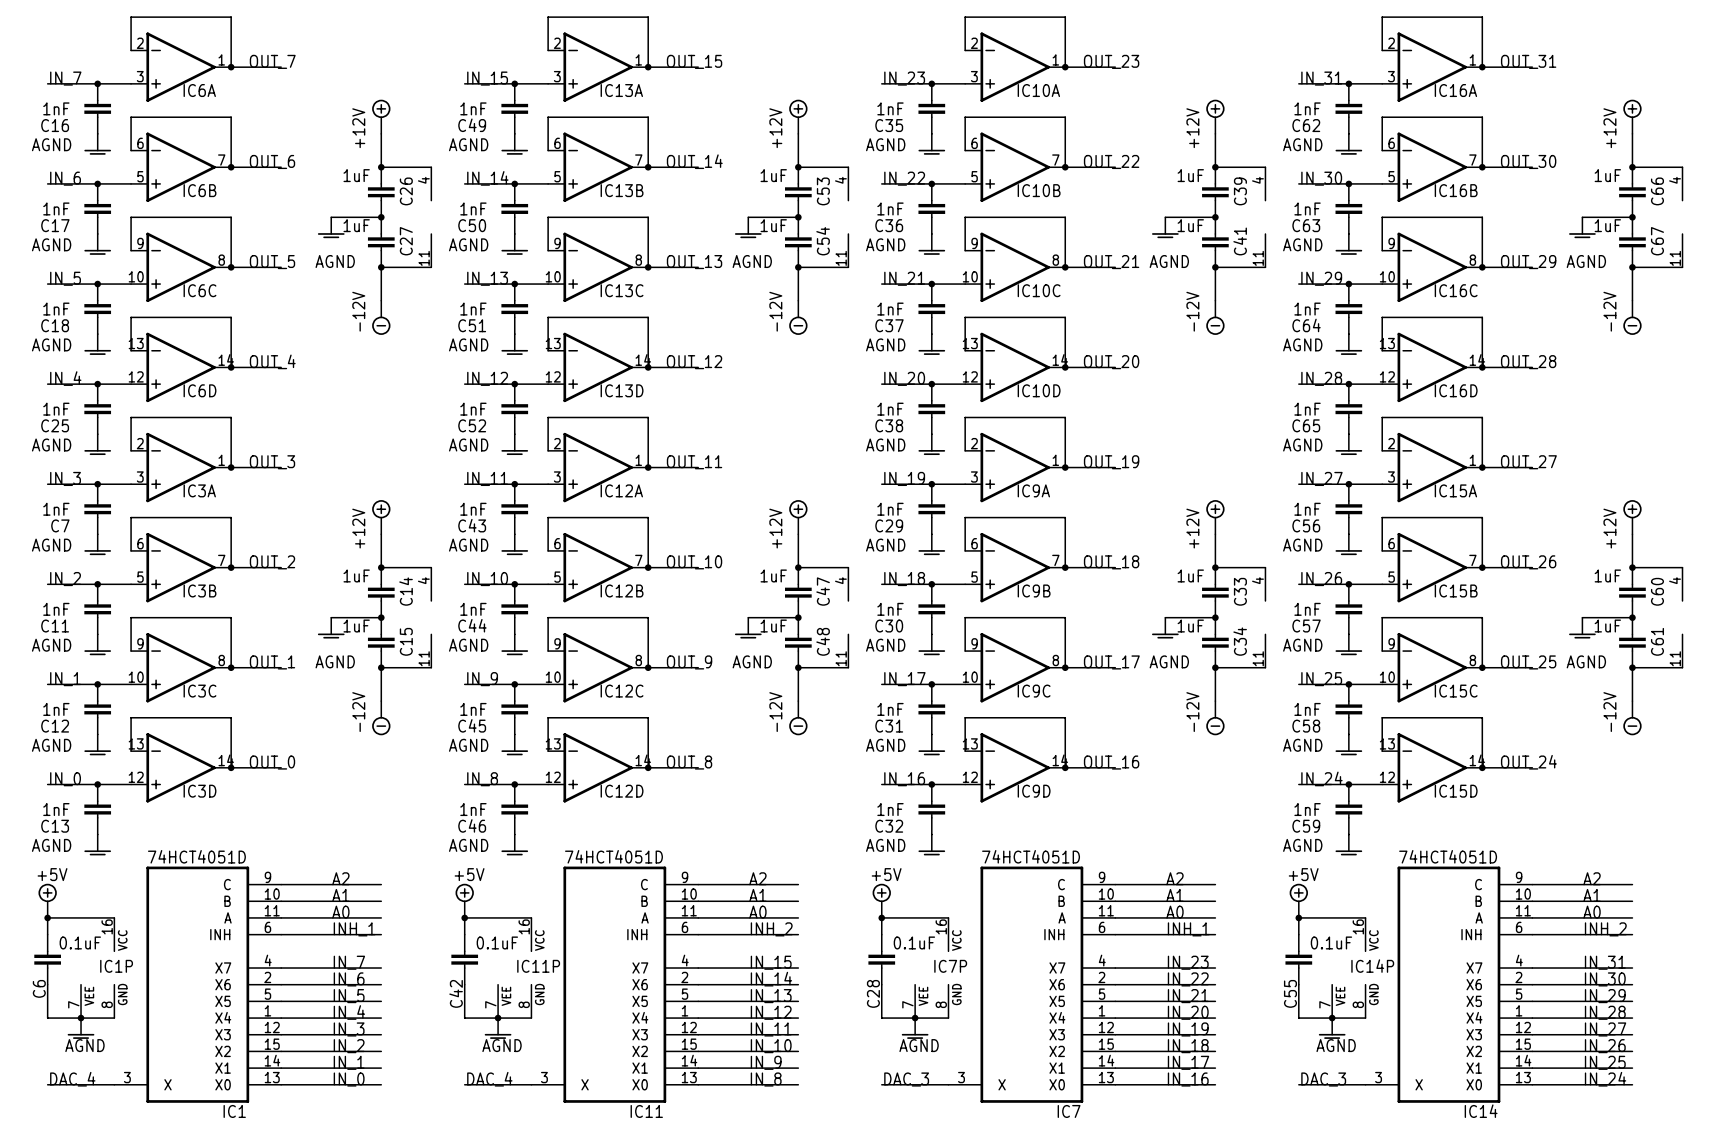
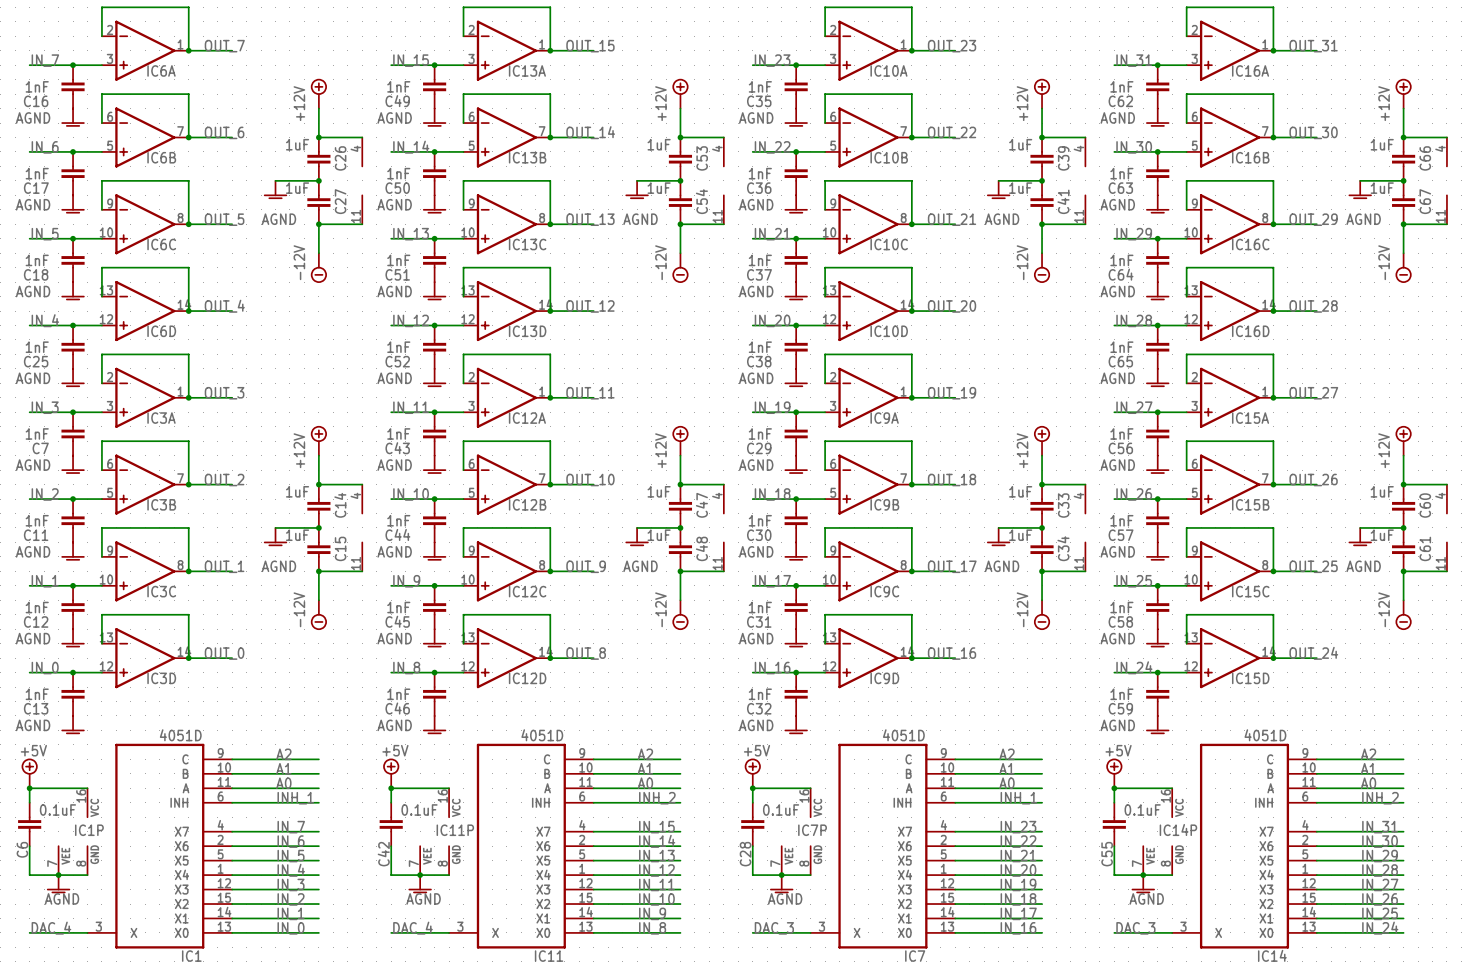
IC1 value: 74HCT4051D (196, 856) -> 4051D (180, 735)
IC11 value: 74HCT4051D (613, 856) -> 4051D (542, 735)
IC7 value: 74HCT4051D (1031, 856) -> 4051D (903, 735)
IC14 value: 74HCT4051D (1448, 856) -> 4051D (1265, 735)

